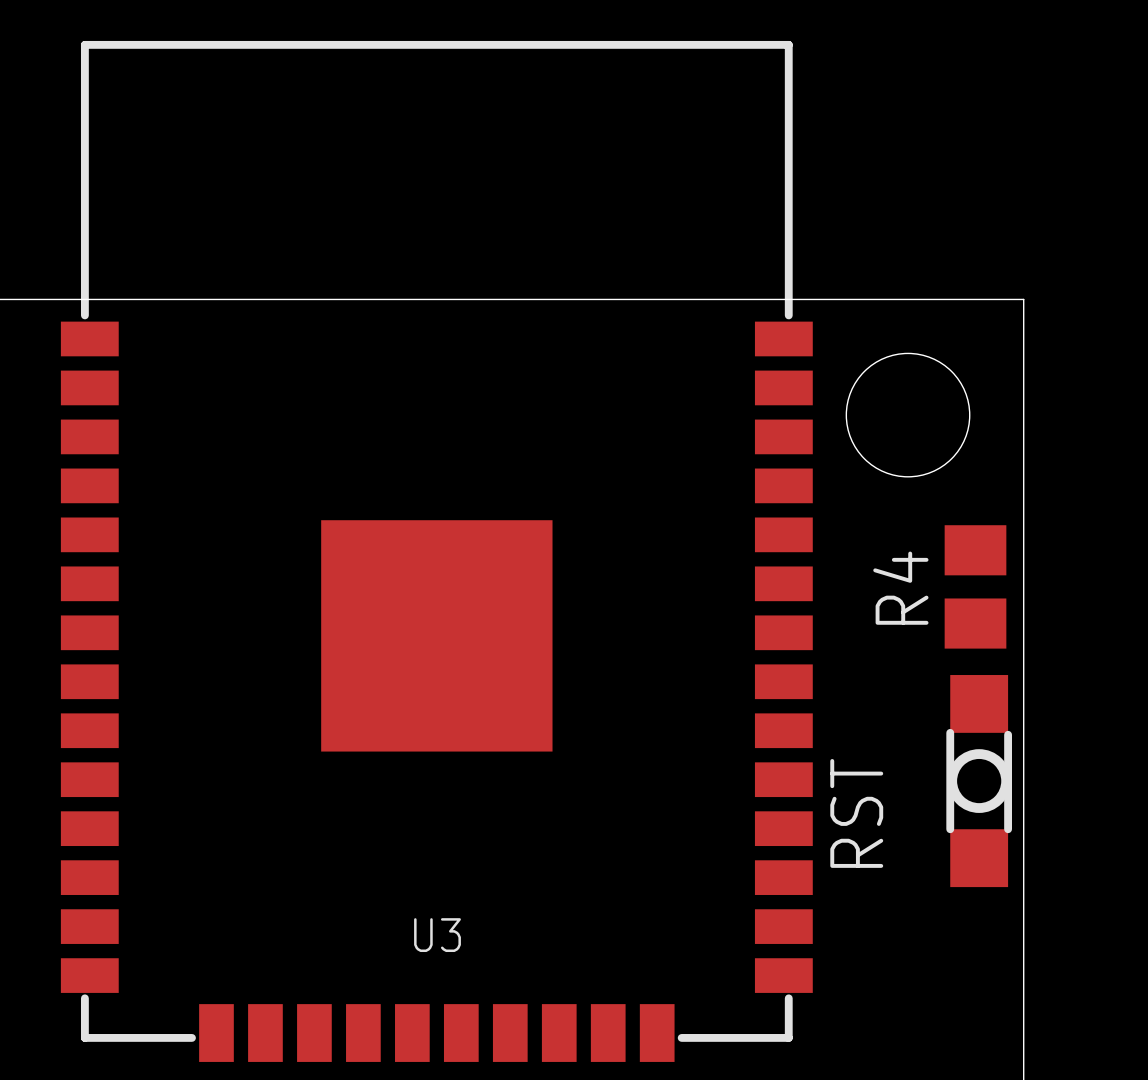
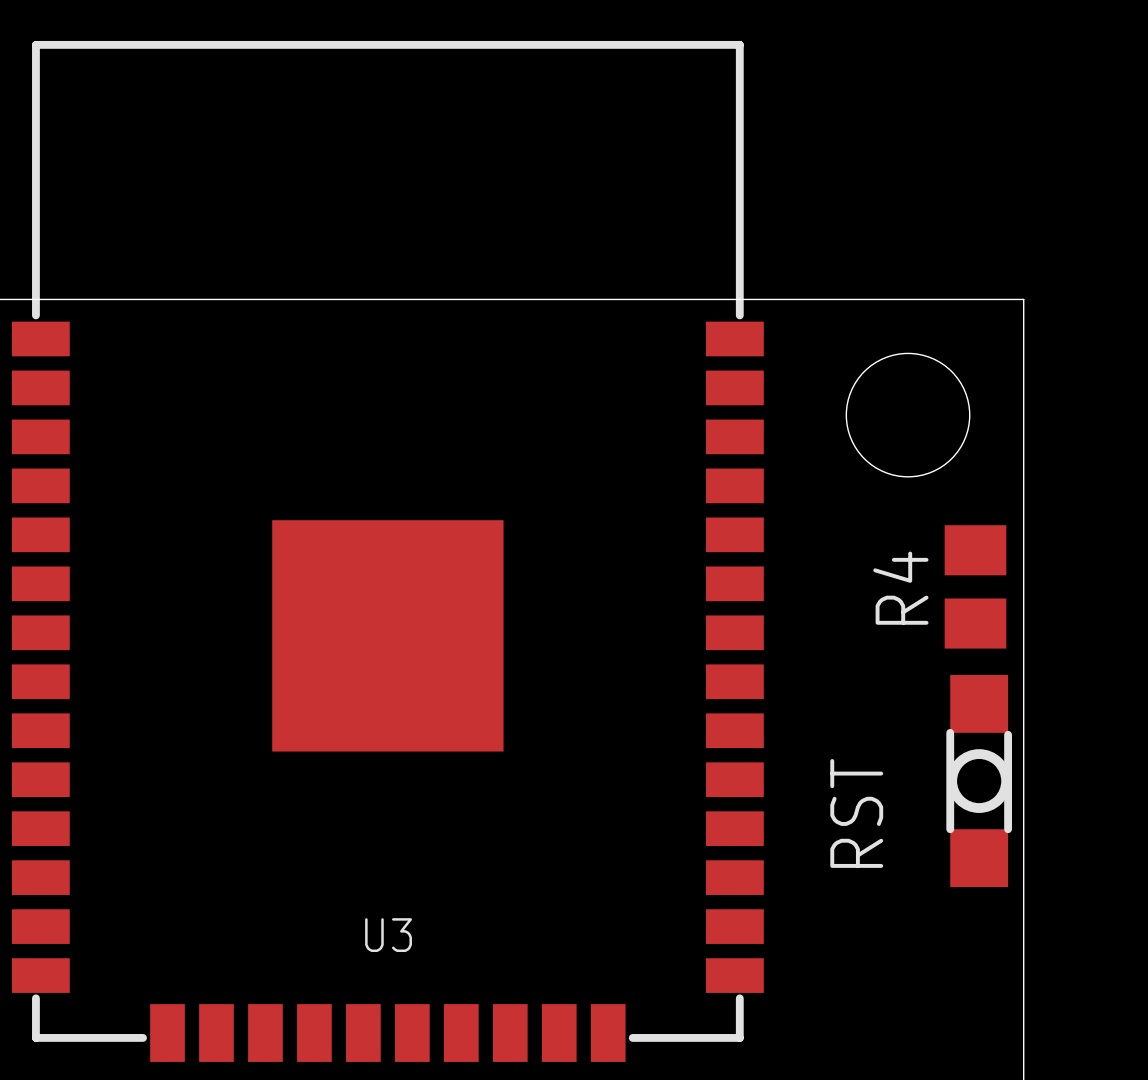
U3 position: (436, 551) -> (387, 551)

